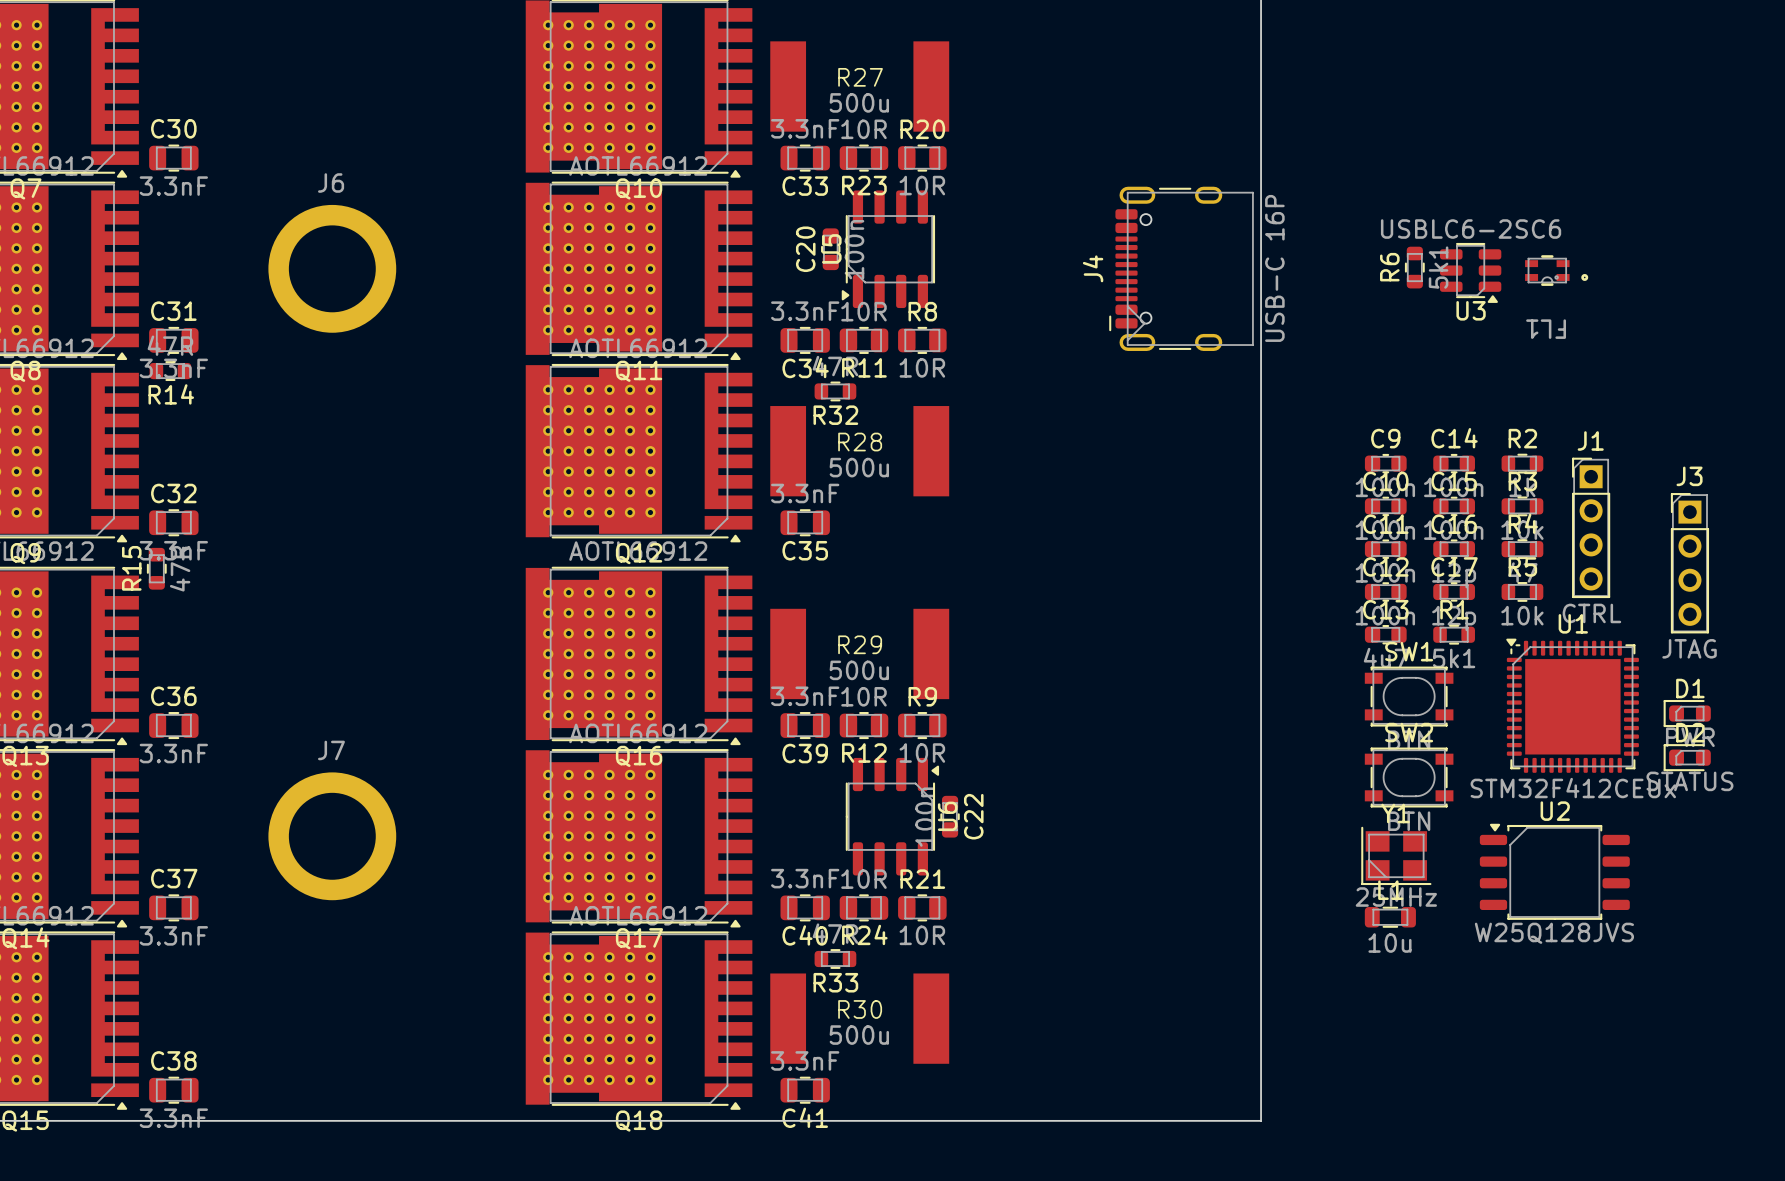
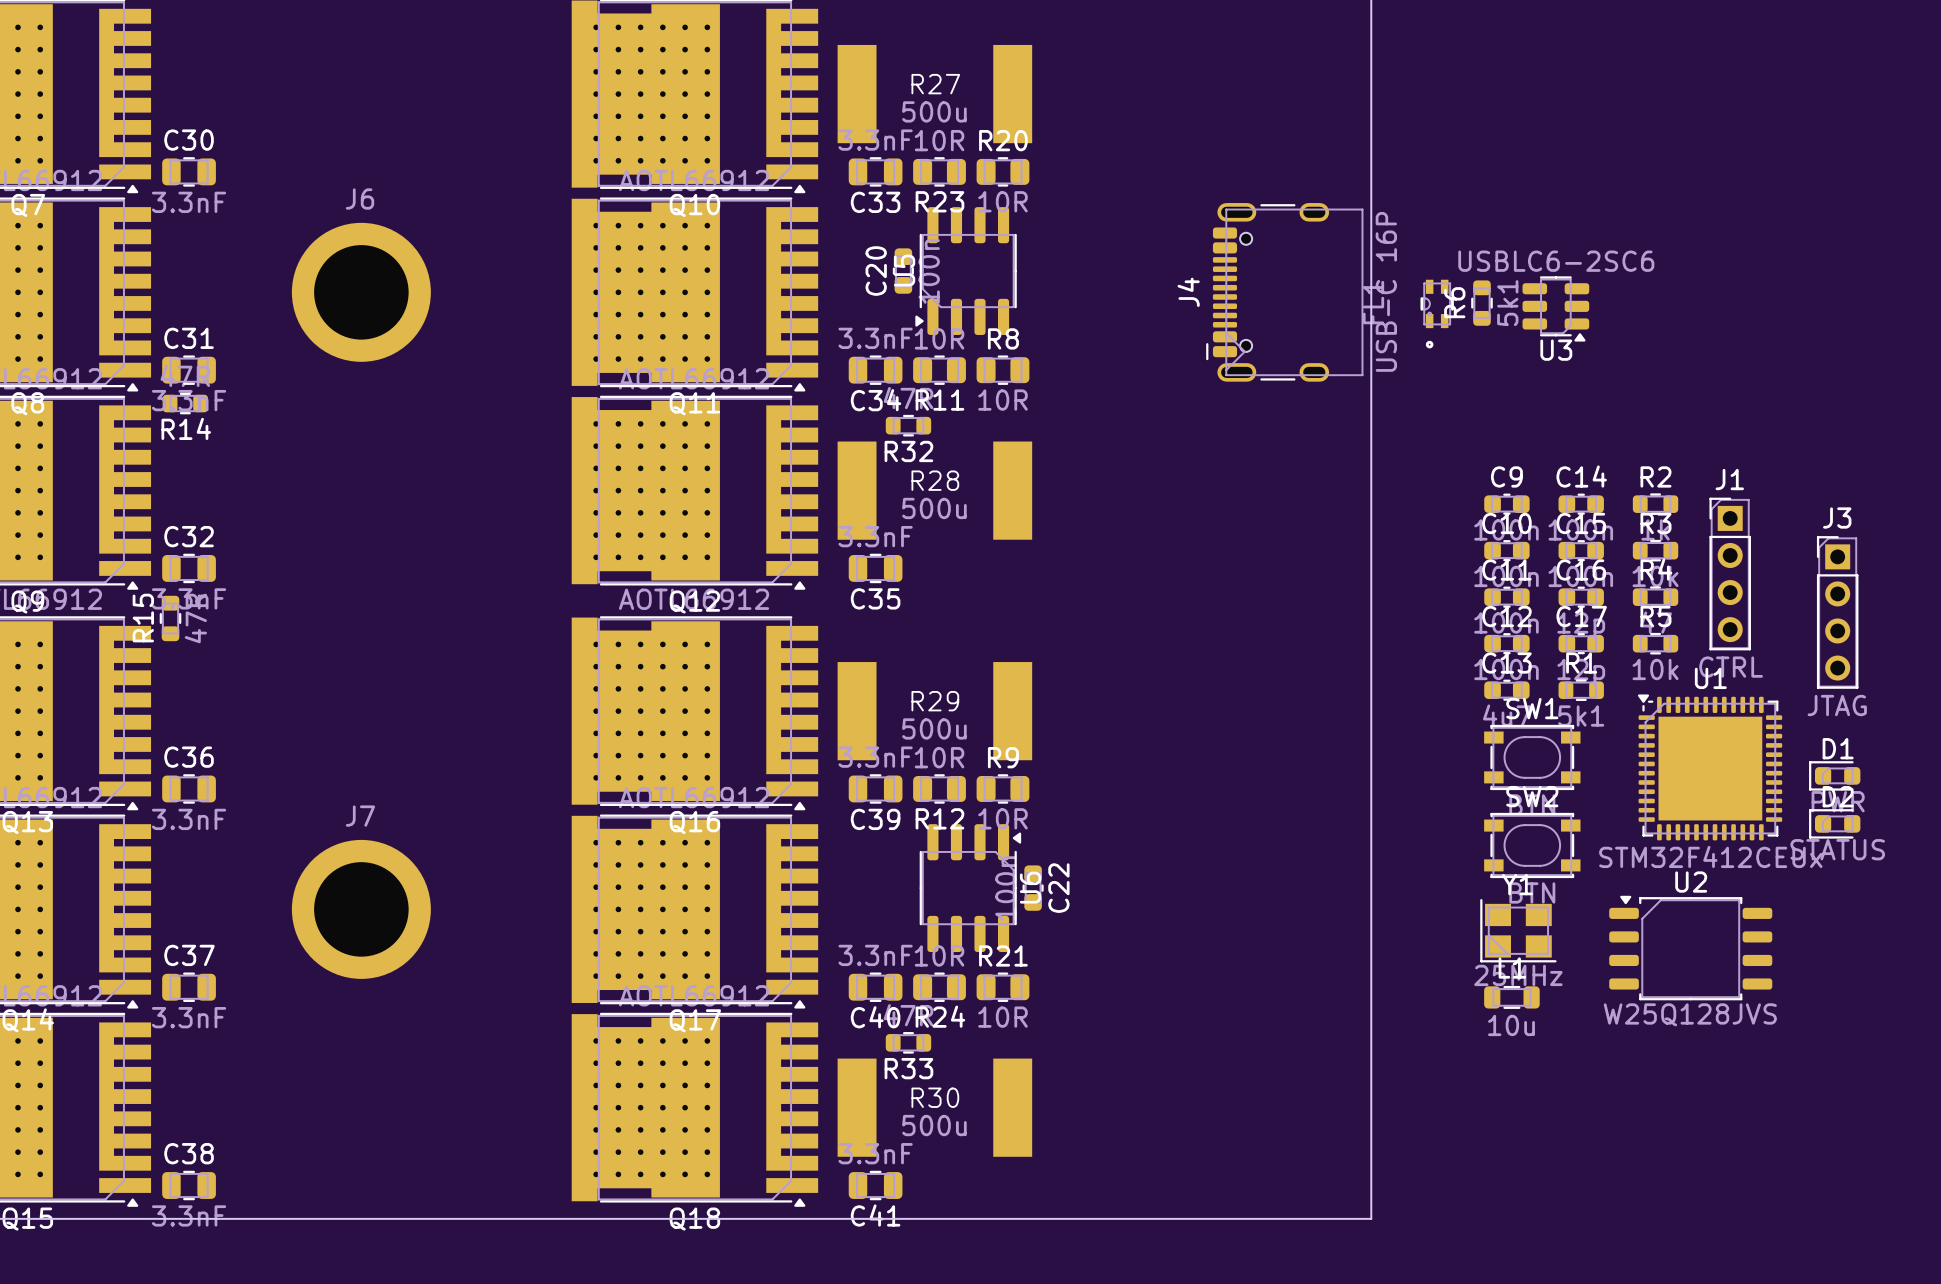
R6 position: (1414, 267) -> (1481, 303)
FL1 rotation: 0° (1556, 270) -> 90° clockwise (1437, 314)
FL1 position: (1556, 270) -> (1437, 314)
U3 position: (1470, 272) -> (1555, 308)

